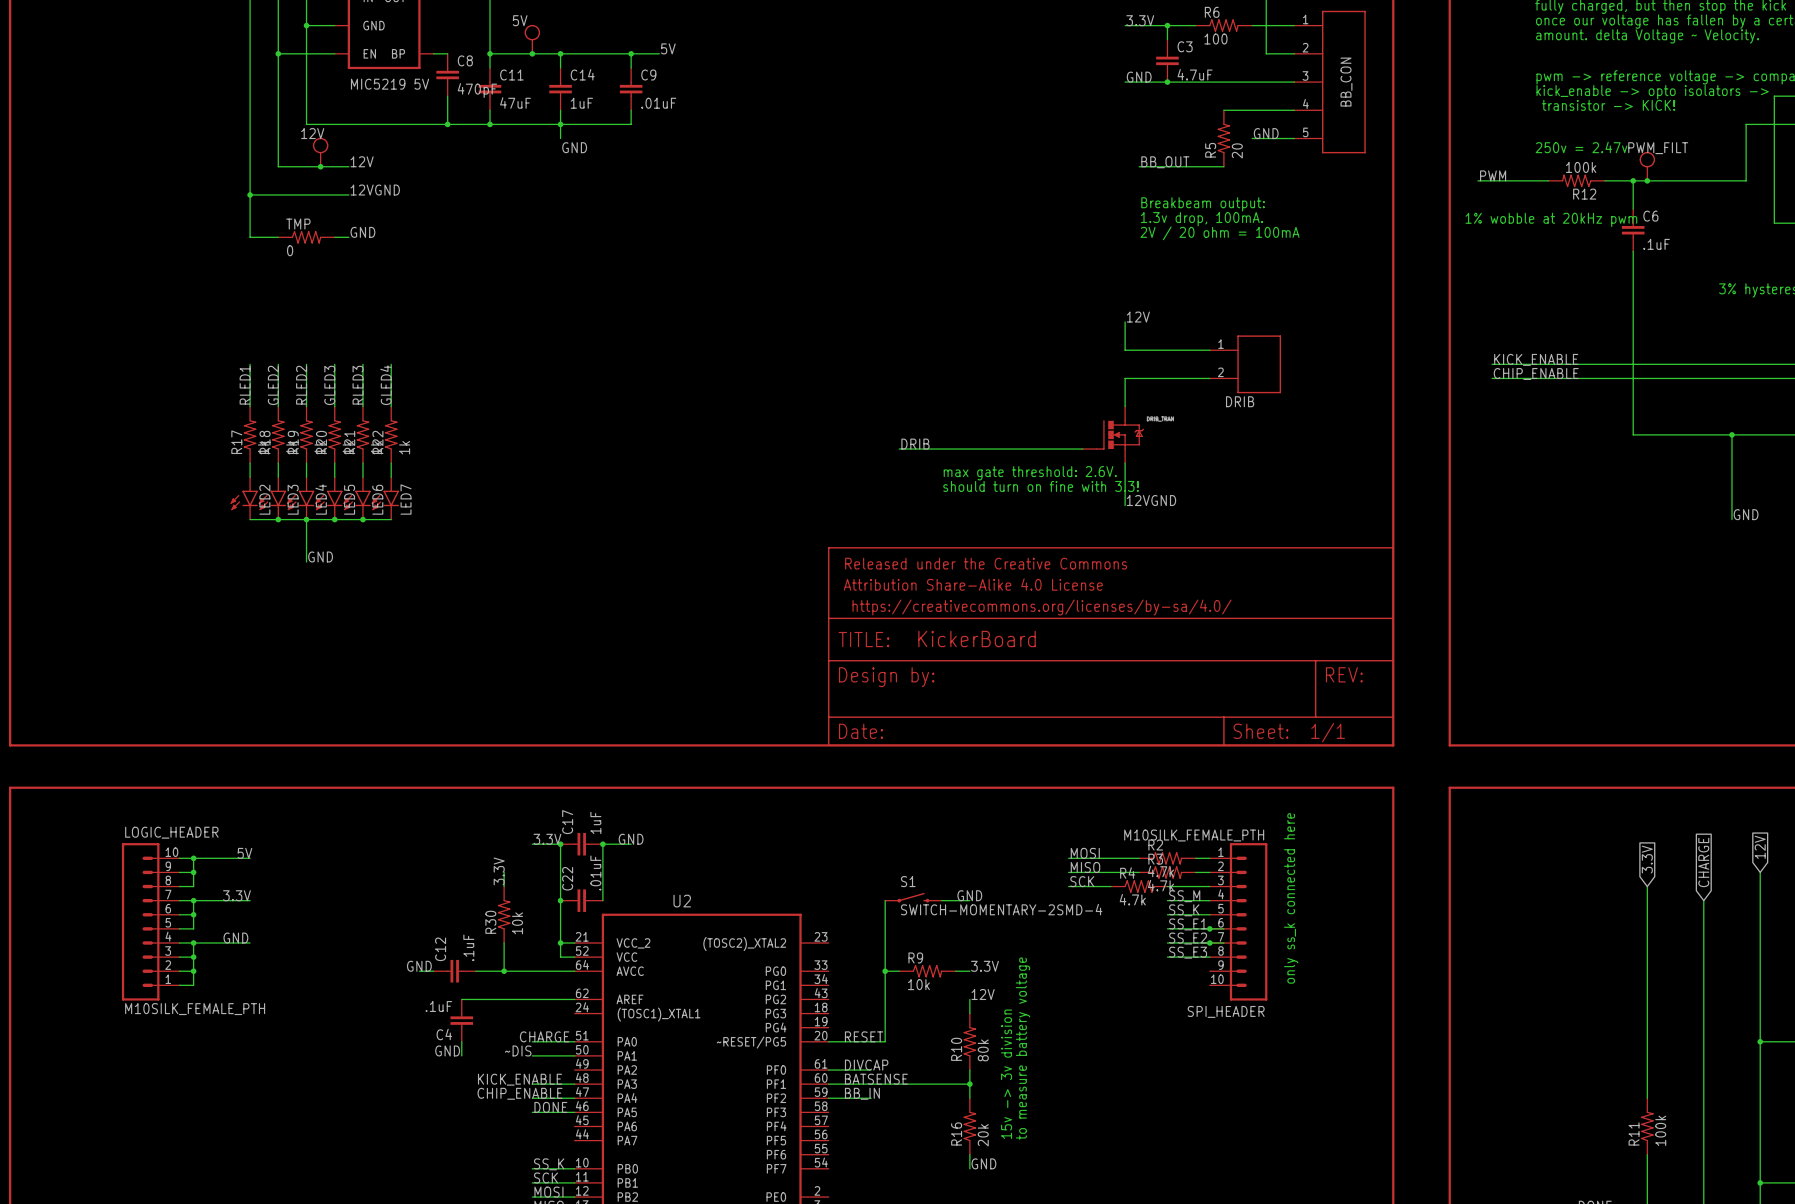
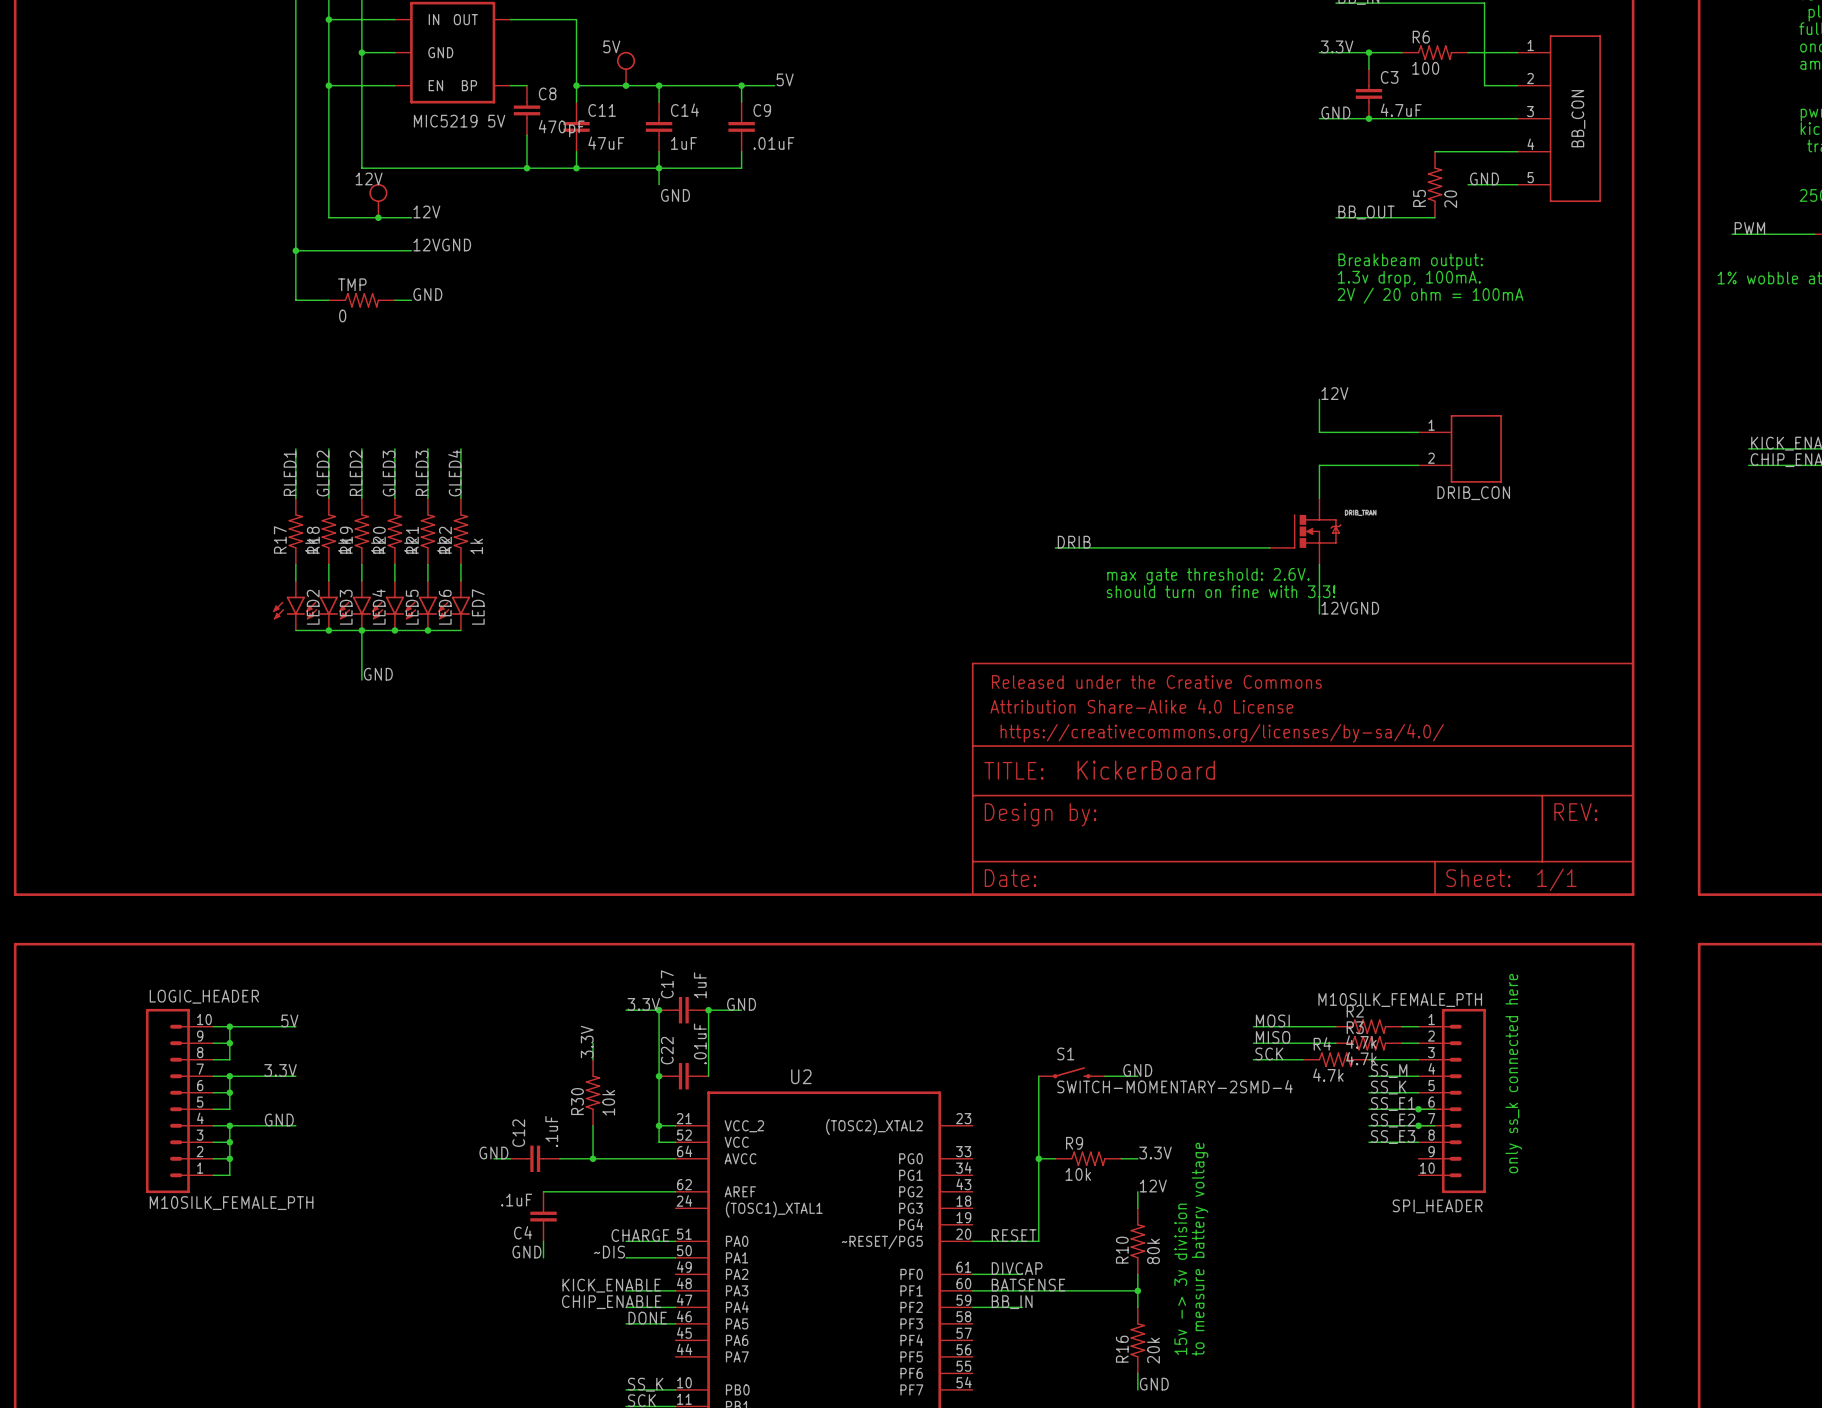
DRIB name: DRIB (1240, 401) -> DRIB_CON (1473, 493)

